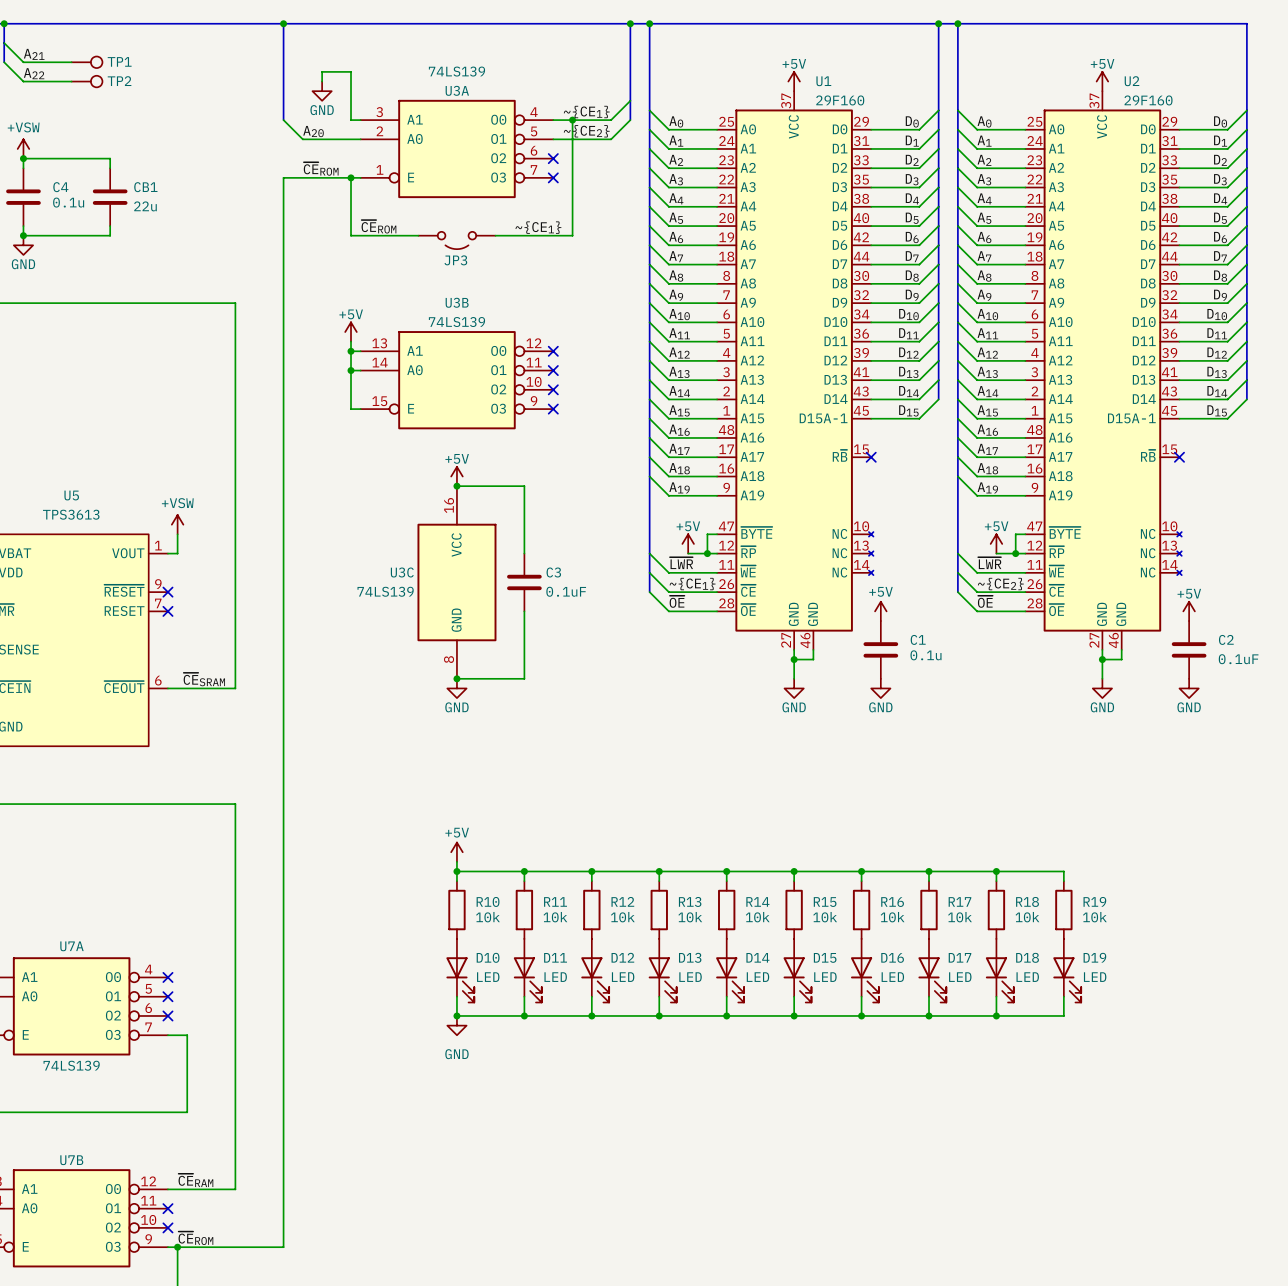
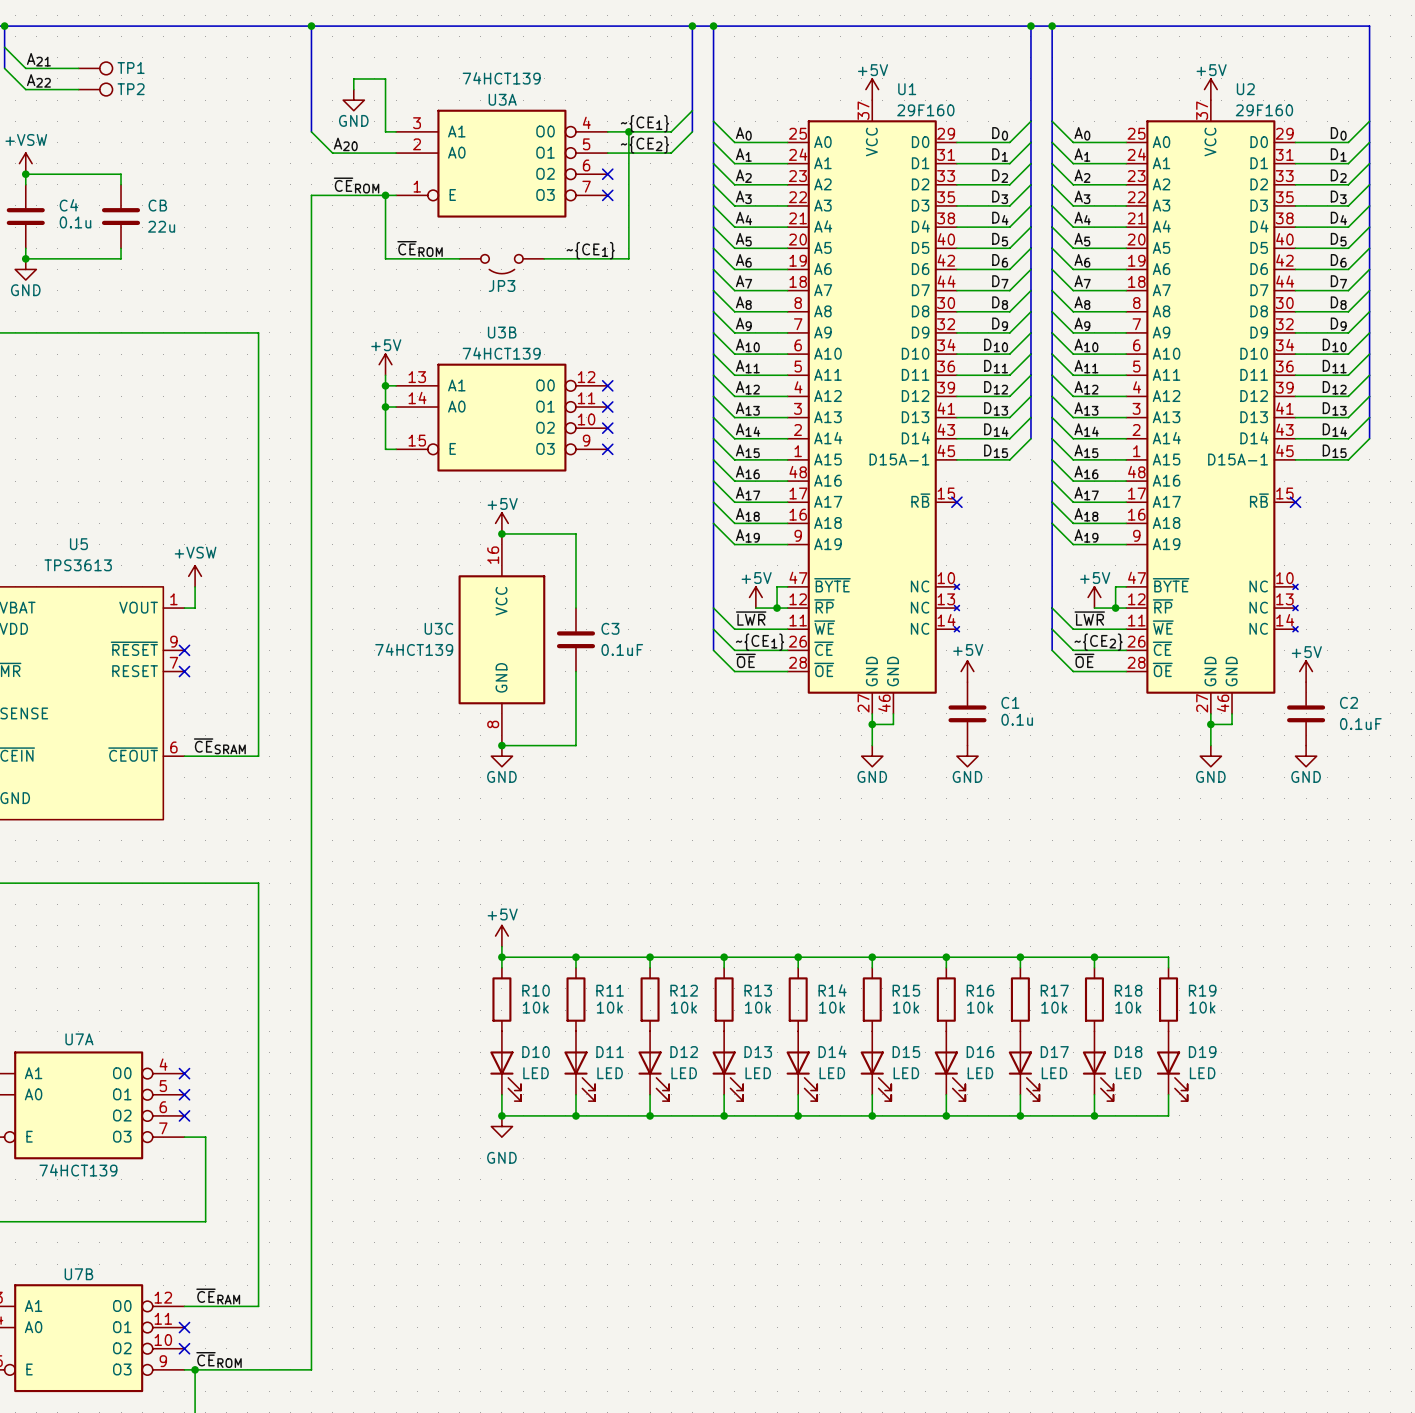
U3A value: 74LS139 (456, 71) -> 74HCT139 (501, 78)
CB1 name: CB1 (145, 187) -> CB (157, 205)
U3B value: 74LS139 (456, 322) -> 74HCT139 (501, 353)
U3C value: 74LS139 (385, 591) -> 74HCT139 (414, 649)
U7A value: 74LS139 (71, 1065) -> 74HCT139 (78, 1170)

